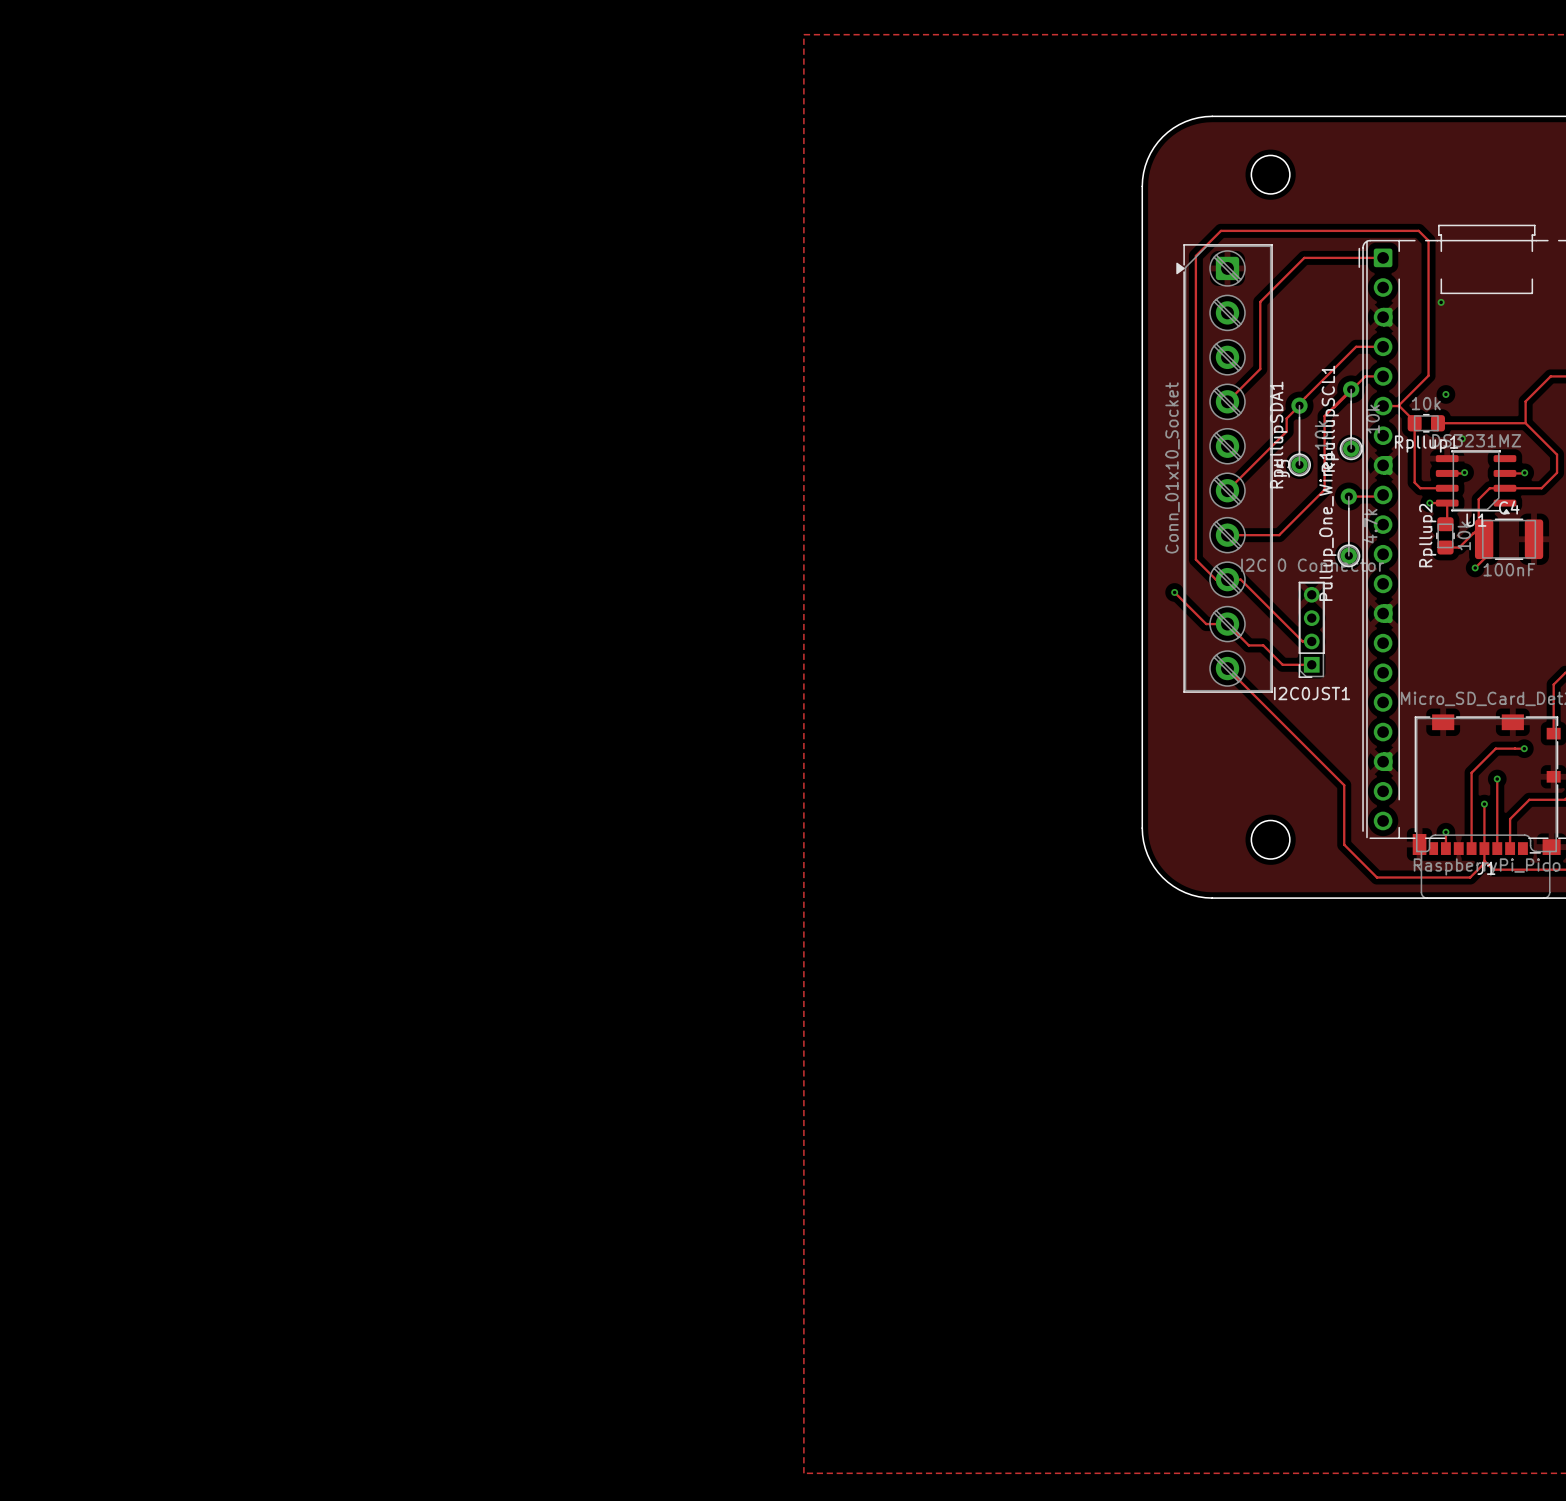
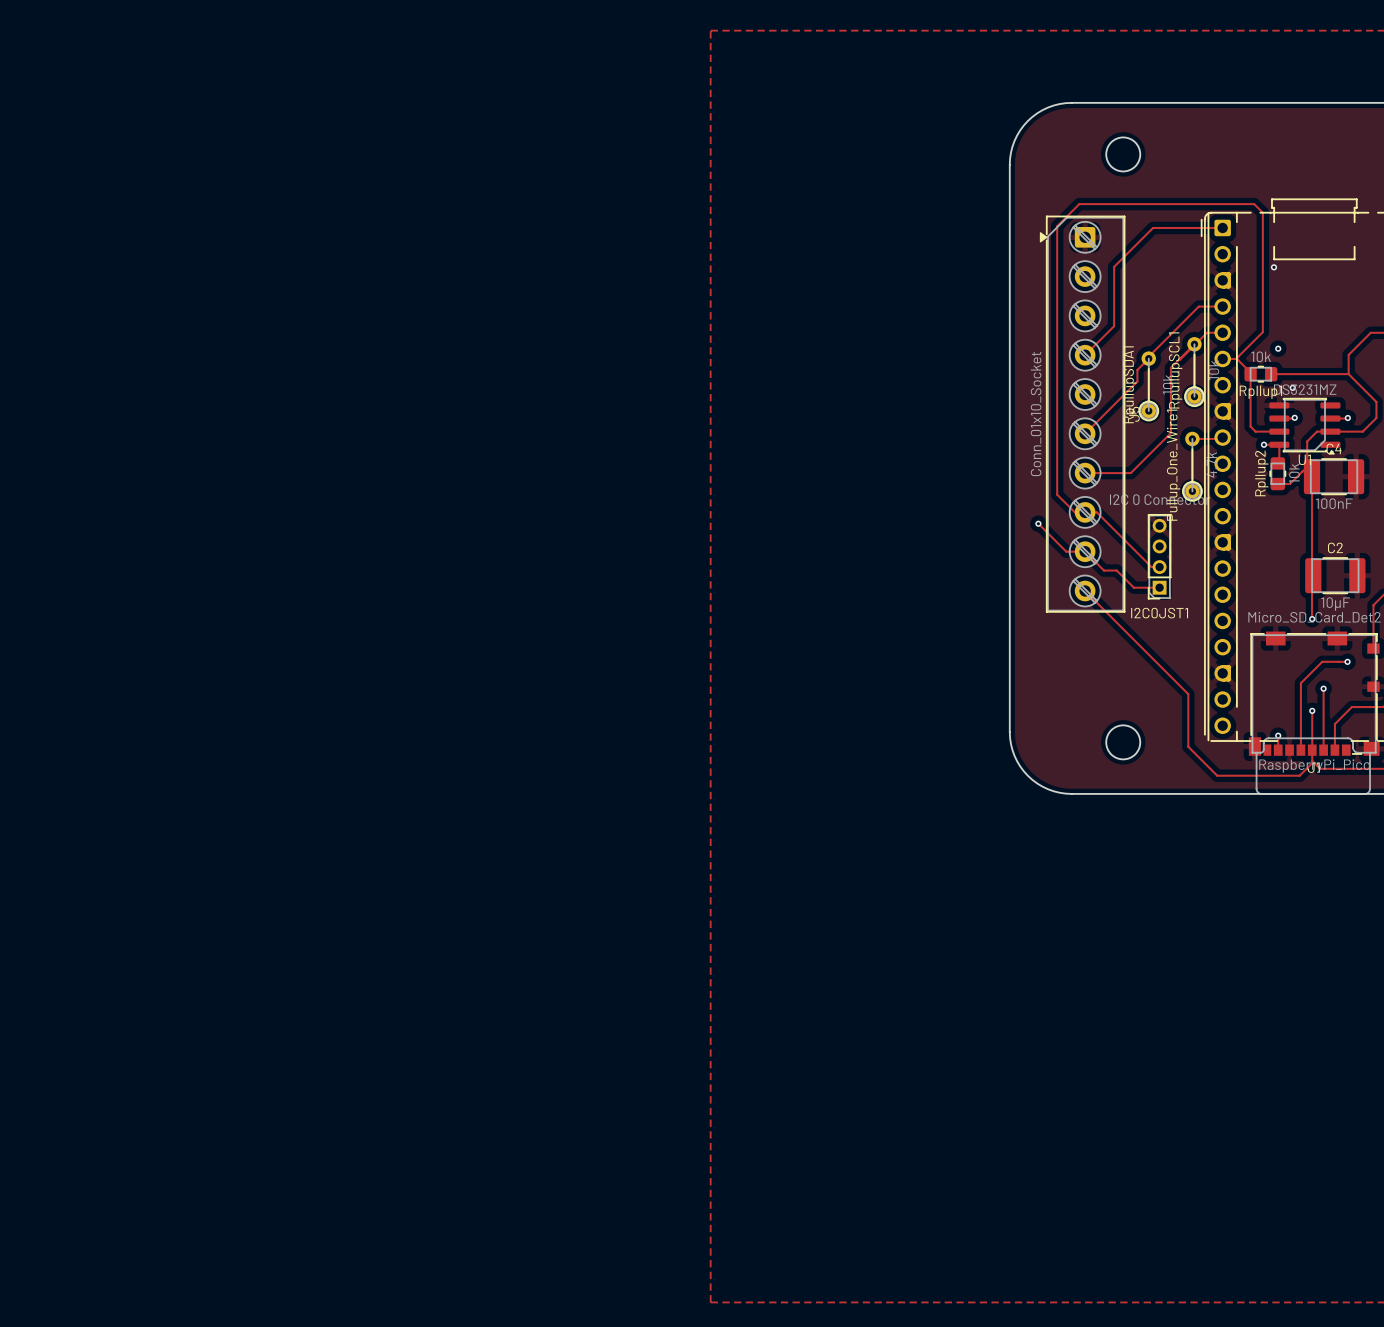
track: none -> (1312, 476) (1312, 619)
track: (1484, 558) (1475, 567) -> none
via: (1475, 567) -> none
C2: none -> 10µF (1335, 575)
via: none -> (1312, 619)

